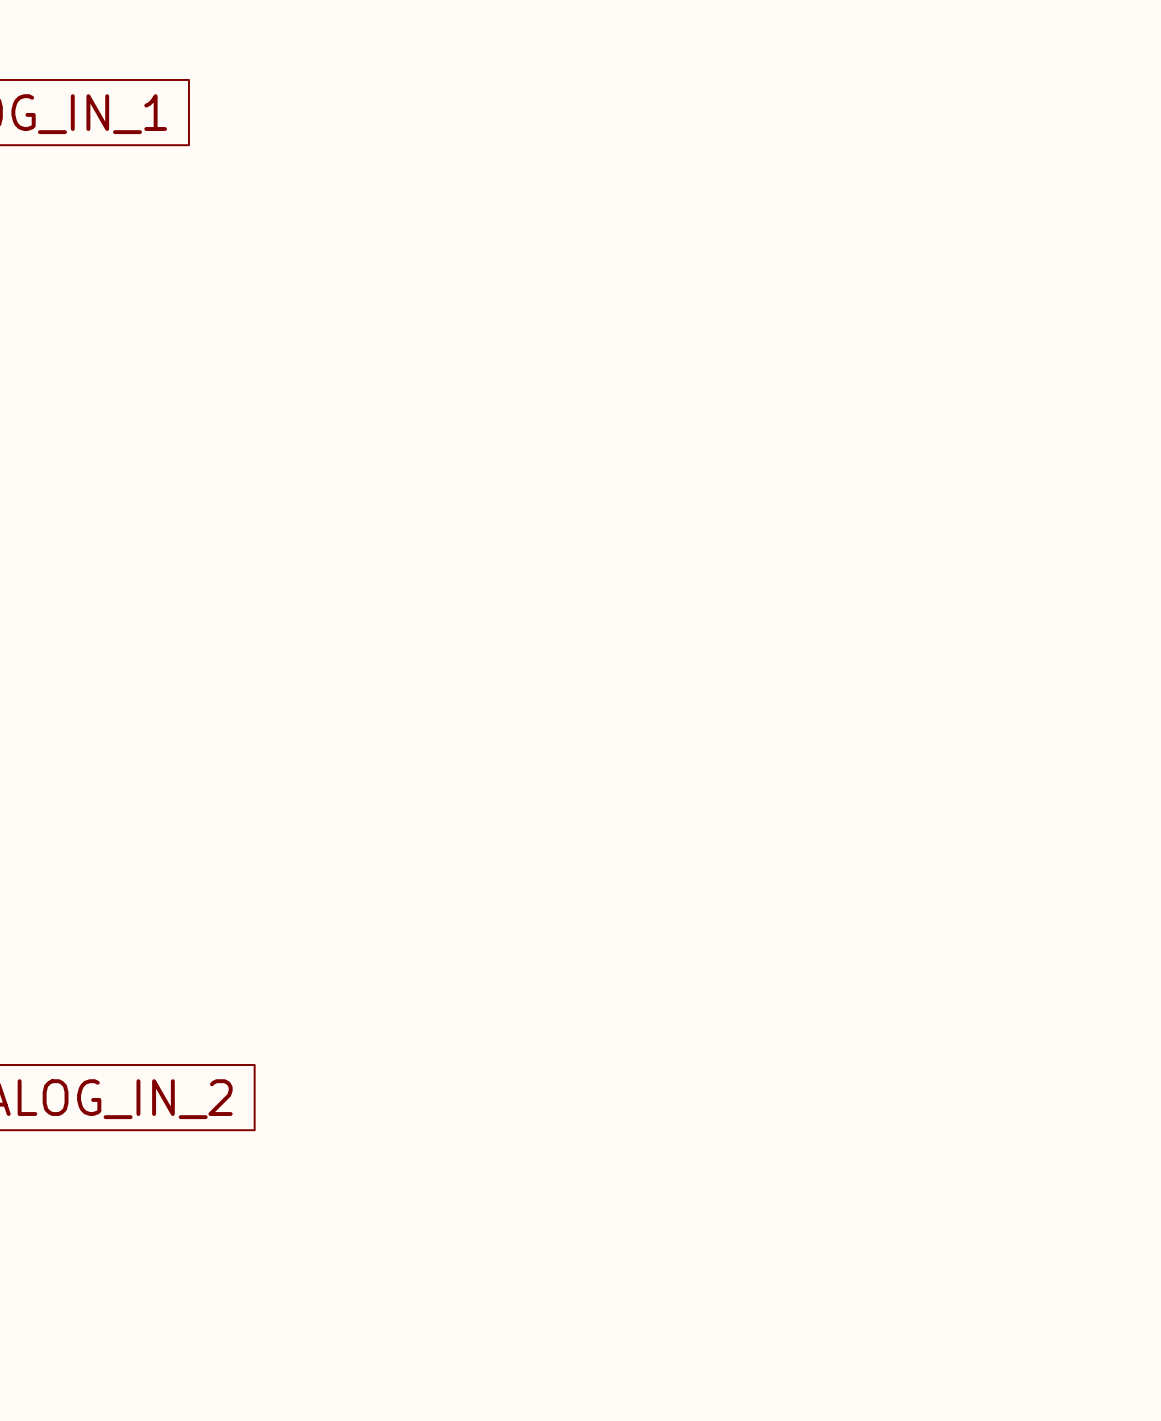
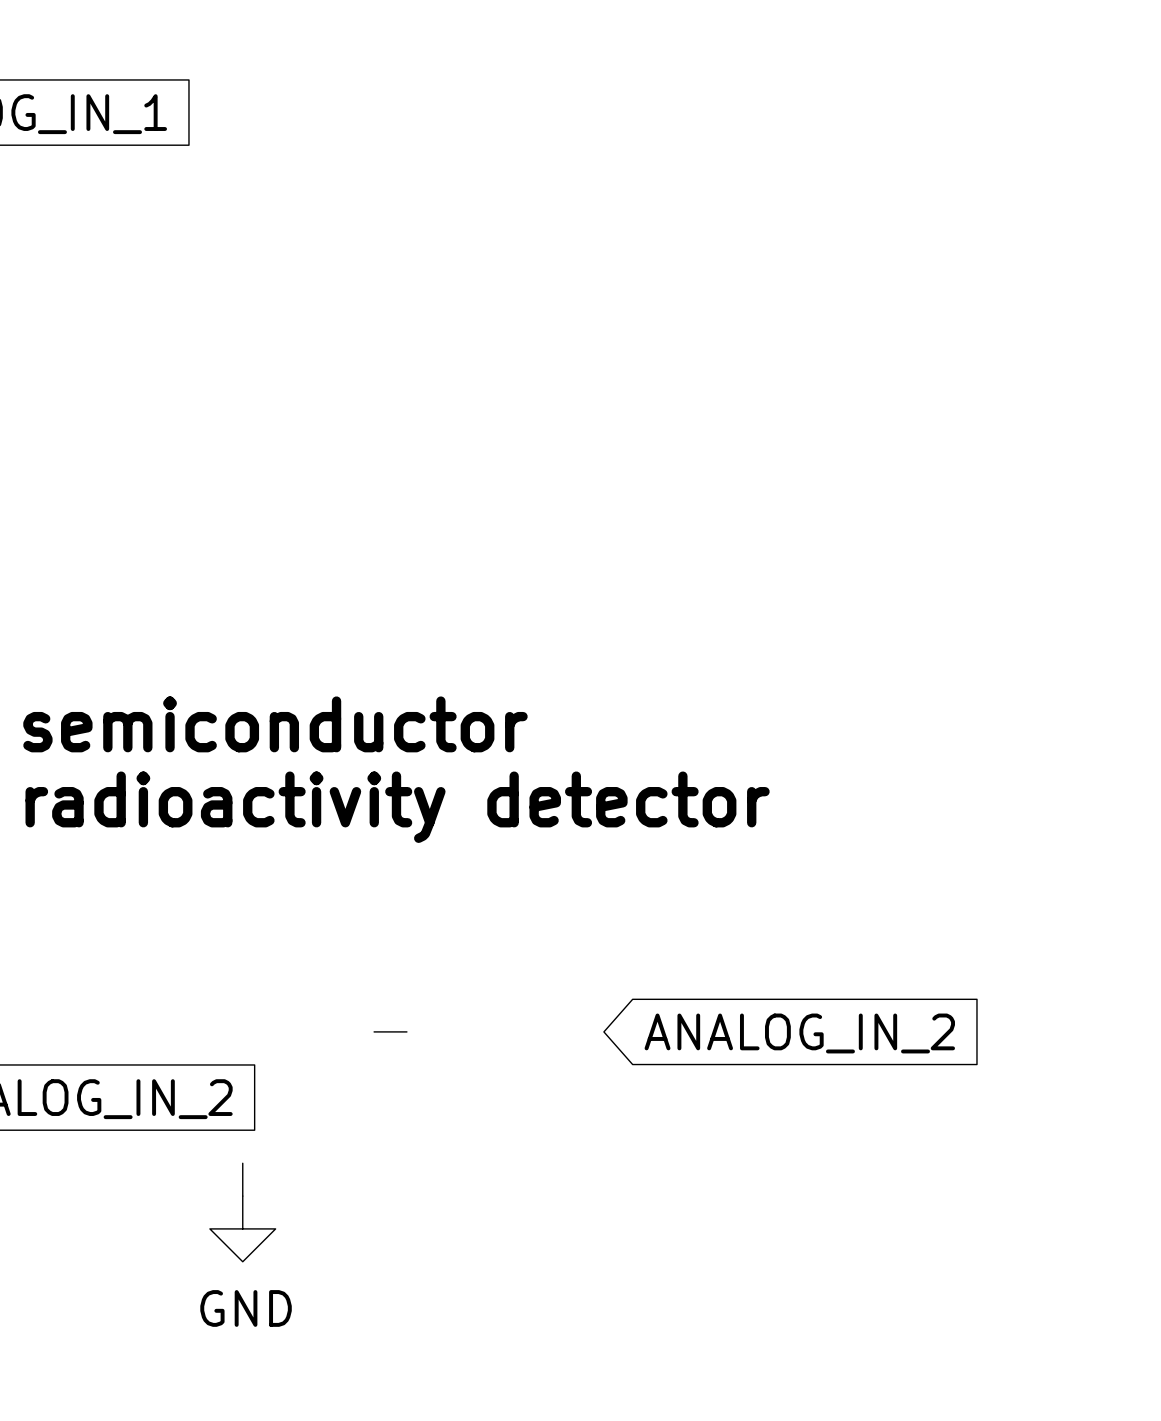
text: none -> semiconductor (275, 724)
text: none -> radioactivity detector (397, 807)
wire: none -> (374, 1031) (406, 1031)
global label: none -> ANALOG_IN_2 (799, 1033)
wire: none -> (242, 1163) (242, 1196)
power symbol: none -> GND (242, 1228)

